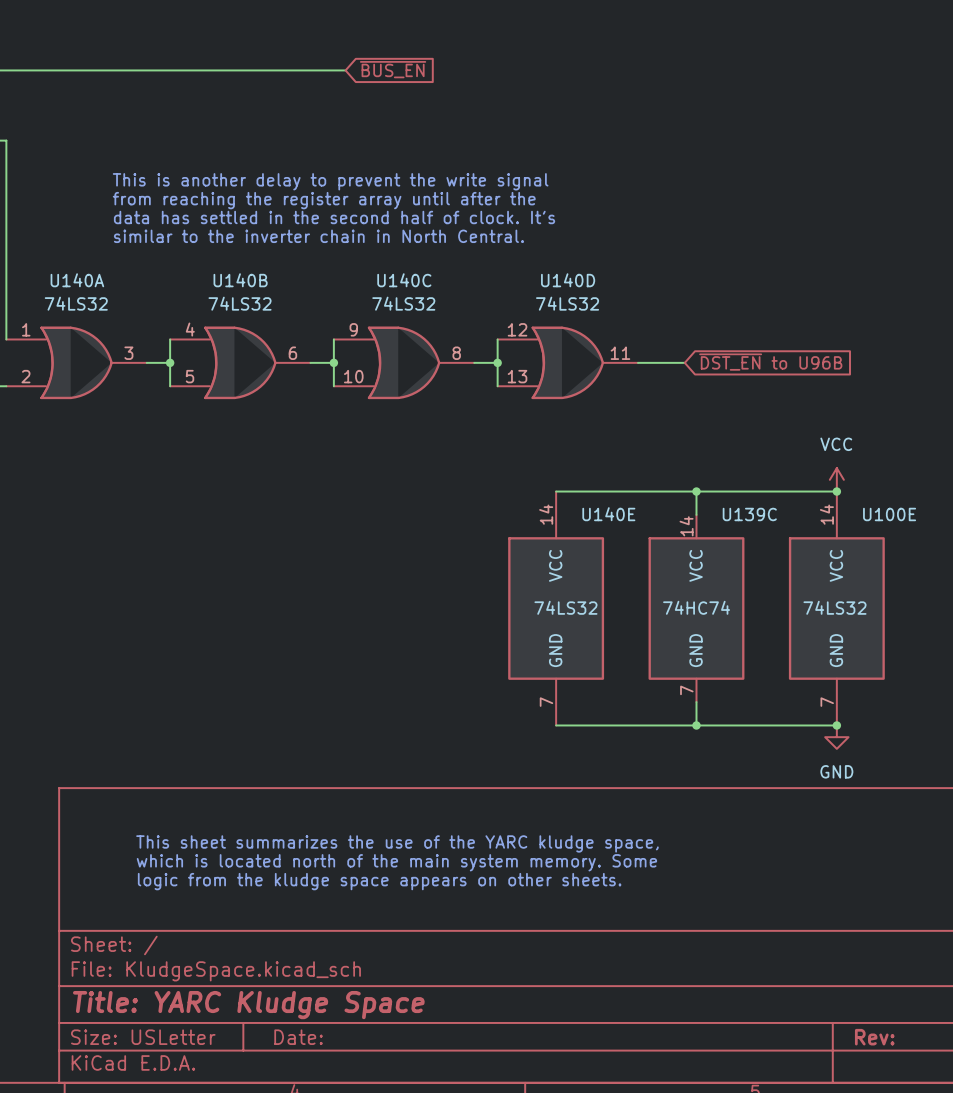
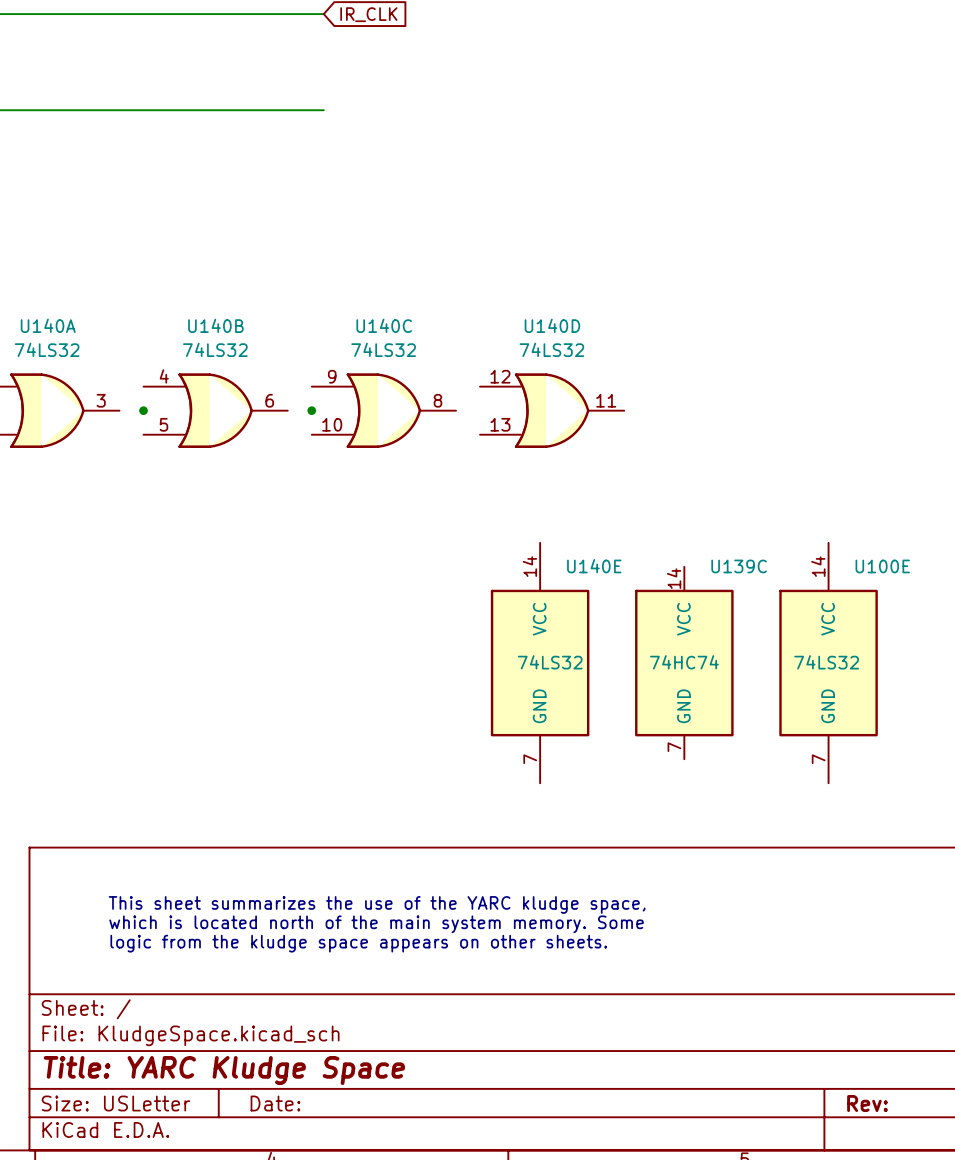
global label: ~{BUS_EN} (393, 69) -> none
text: This is another delay to prevent the write signal (330, 181) -> none
text: from reaching the register array until after the (324, 200) -> none
text: data has settled in the second half of clock. It's (334, 217) -> none
text: similar to the inverter chain in North Central. (318, 236) -> none
wire: (170, 339) (170, 386) -> none
wire: (333, 339) (333, 386) -> none
wire: (497, 339) (497, 386) -> none
wire: (146, 362) (170, 362) -> none
wire: (310, 362) (333, 362) -> none
wire: (474, 362) (497, 362) -> none
junction: (497, 362) -> none
wire: (638, 362) (684, 362) -> none
global label: ~{DST_EN} to U96B (770, 362) -> none
power symbol: VCC (836, 479) -> none
wire: (556, 491) (836, 491) -> none
wire: (696, 491) (696, 514) -> none
junction: (696, 491) -> none
junction: (836, 491) -> none
wire: (696, 702) (696, 725) -> none
wire: (556, 725) (836, 725) -> none
junction: (696, 725) -> none
junction: (836, 725) -> none
power symbol: GND (836, 737) -> none

